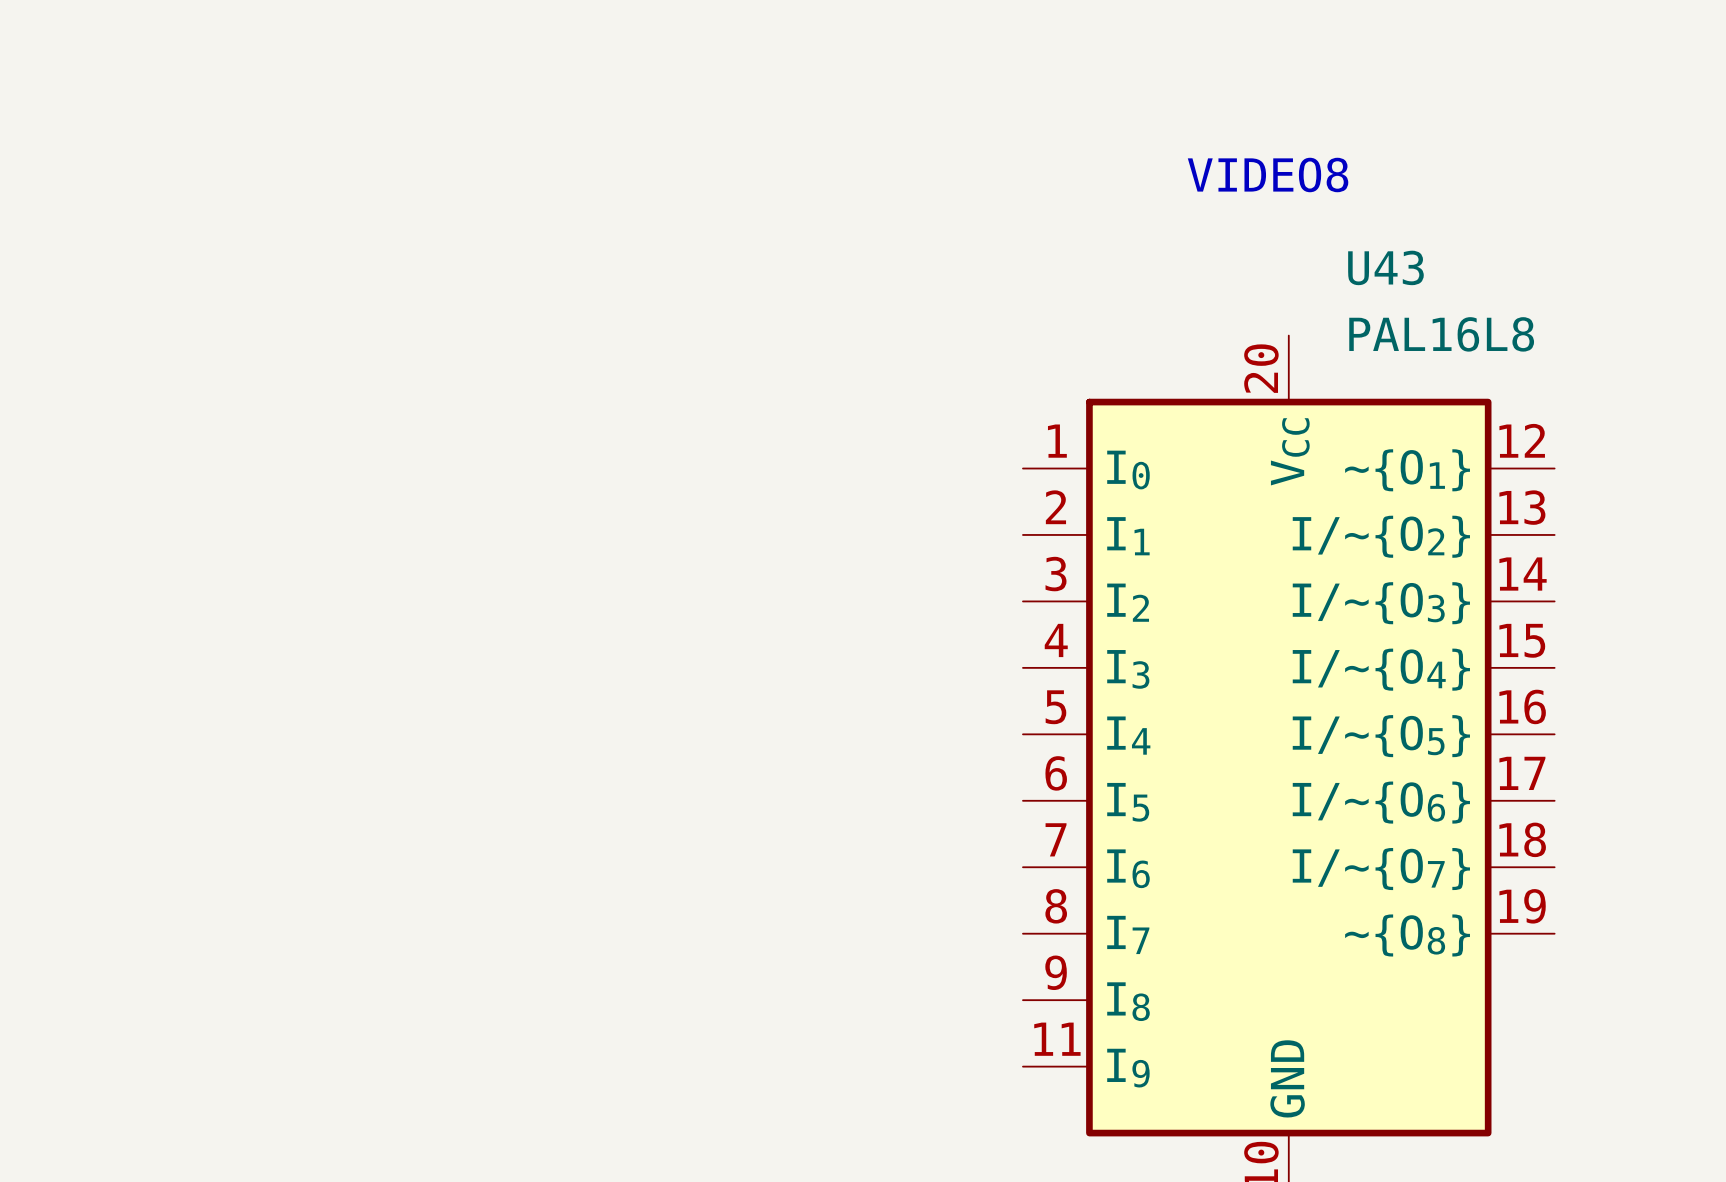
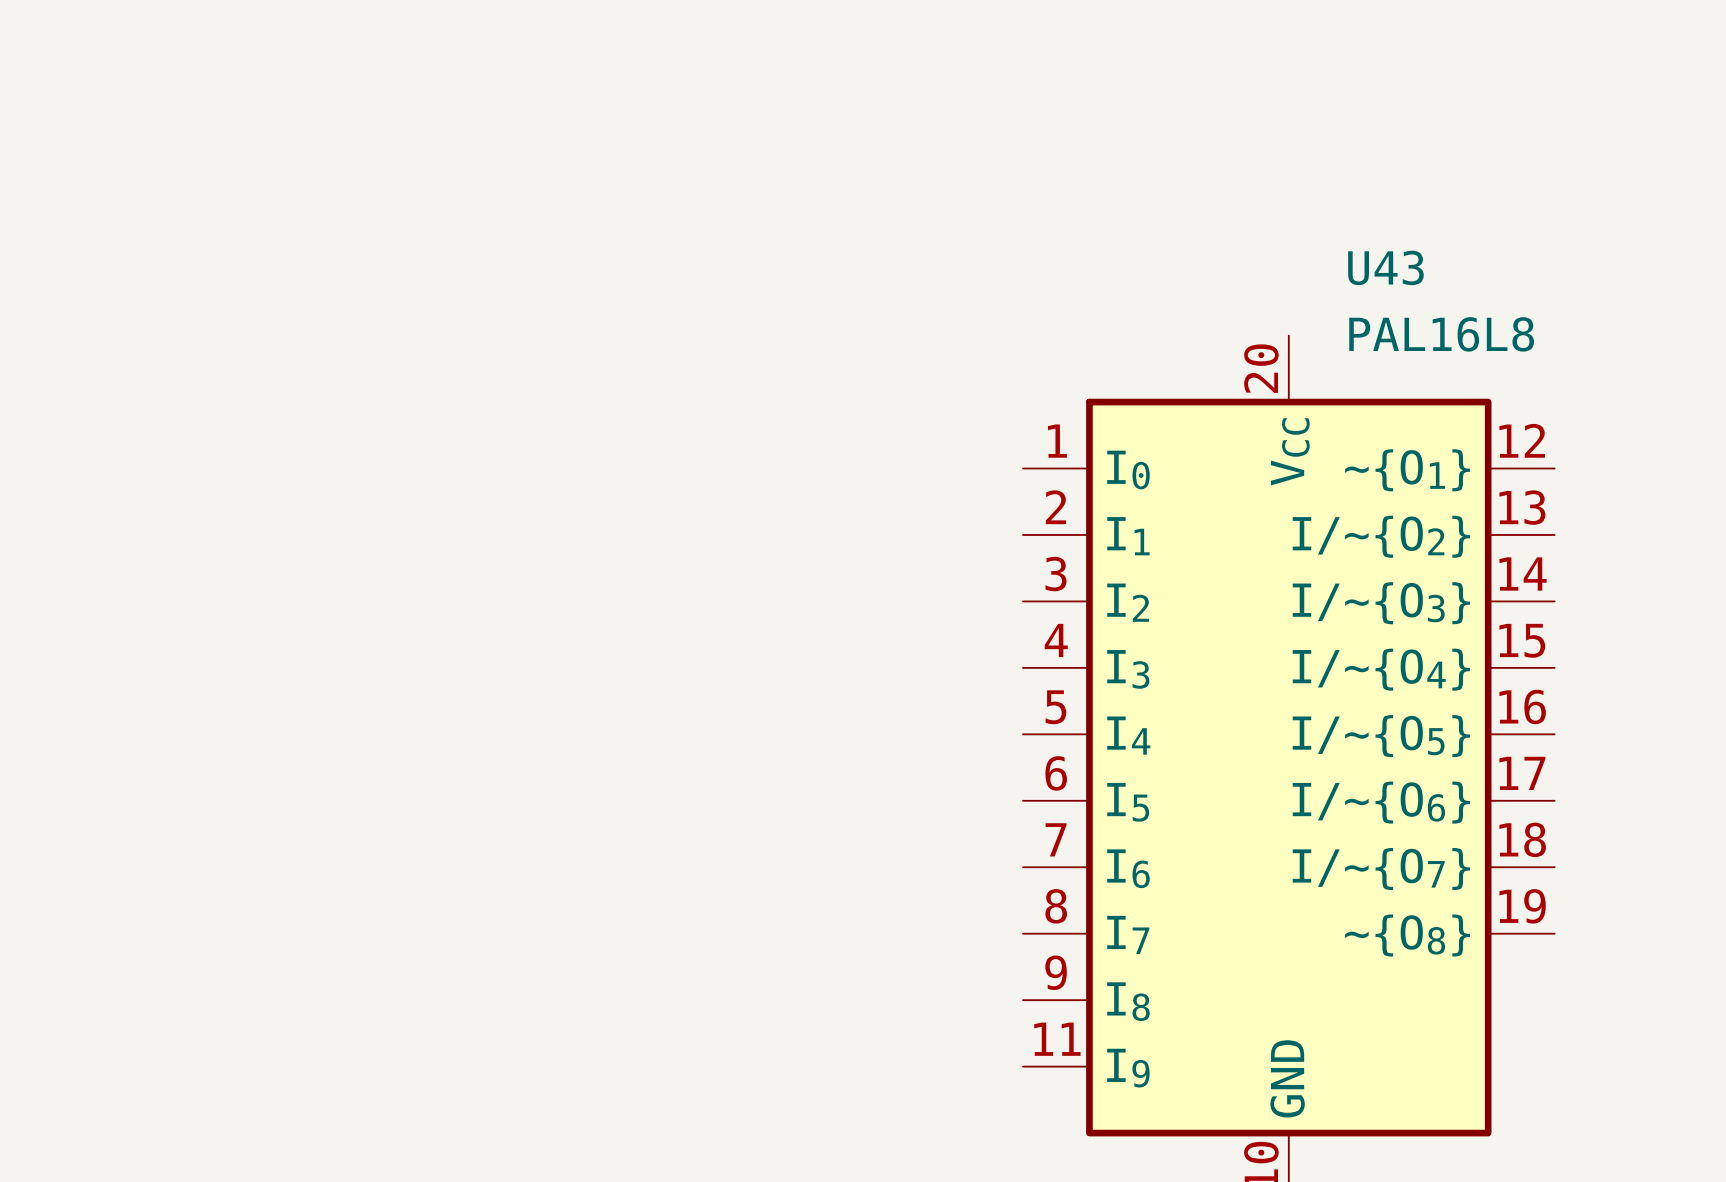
text: VIDEO8 (1268, 175) -> none

